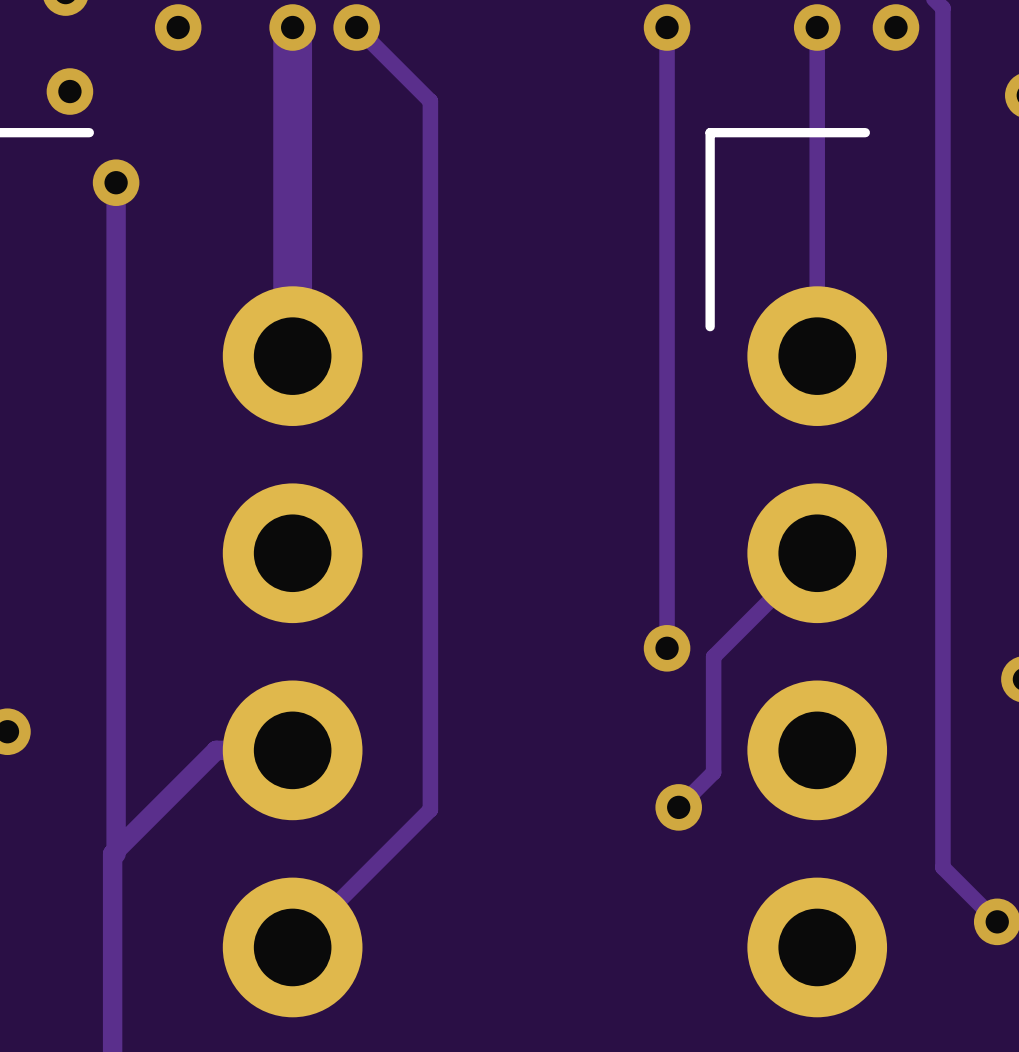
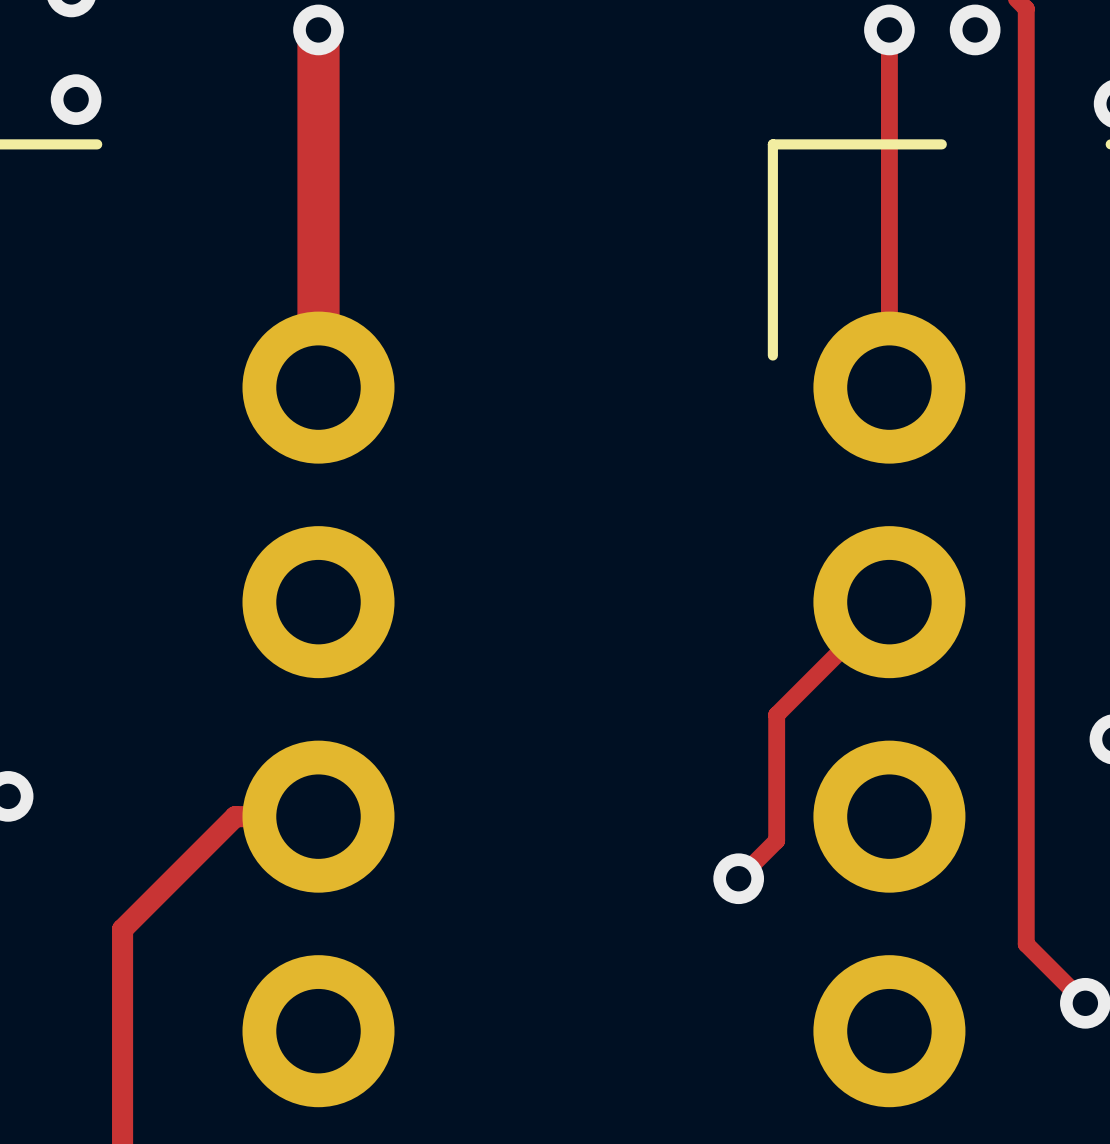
via: (178, 27) -> none
track: (356, 27) (430, 101) (430, 809) (292, 947) -> none
via: (356, 27) -> none
track: (667, 27) (667, 648) -> none
via: (667, 27) -> none
track: (116, 182) (116, 853) -> none
via: (116, 182) -> none
via: (667, 648) -> none

